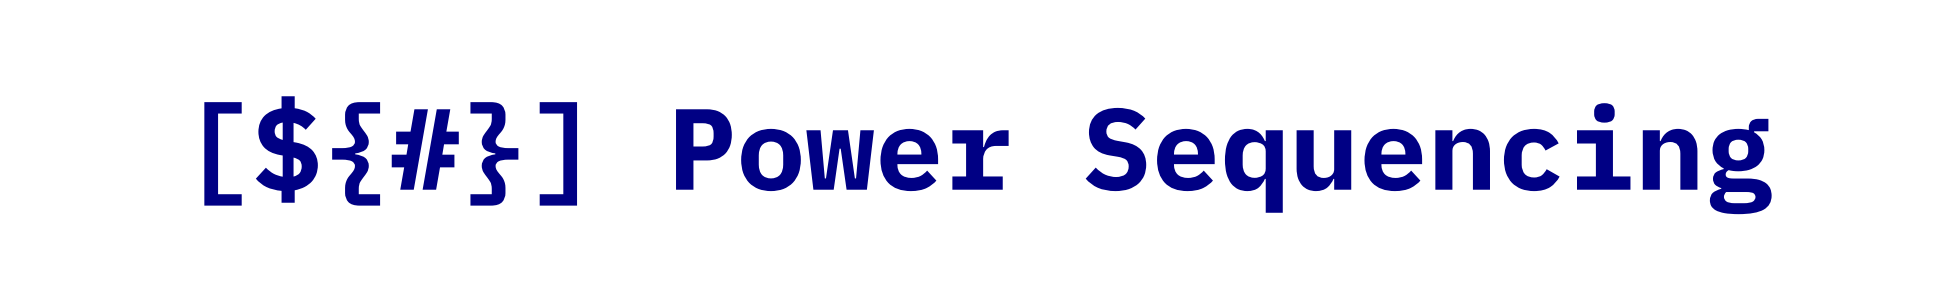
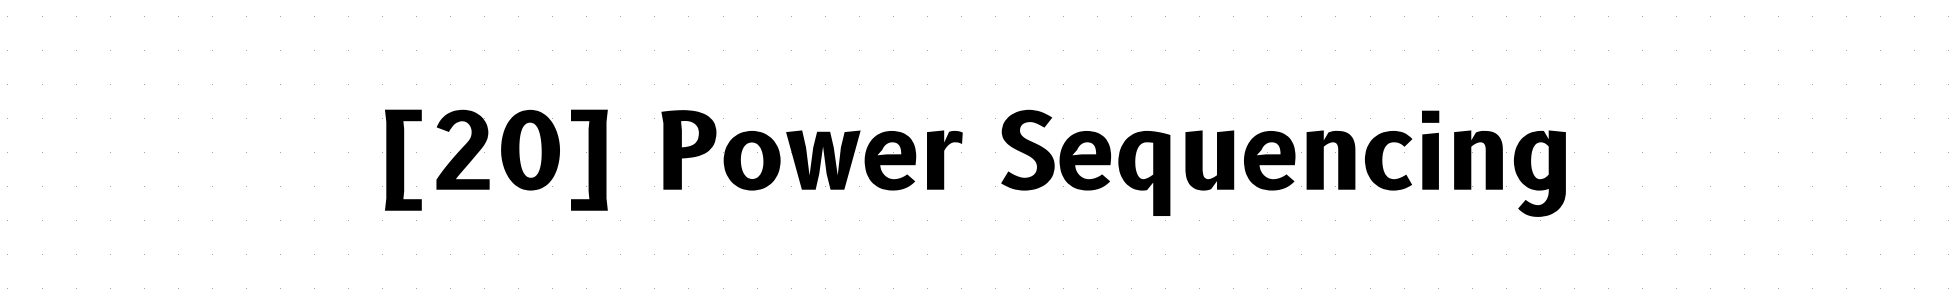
text: [${#}] Power Sequencing (987, 155) -> [20] Power Sequencing (975, 163)

